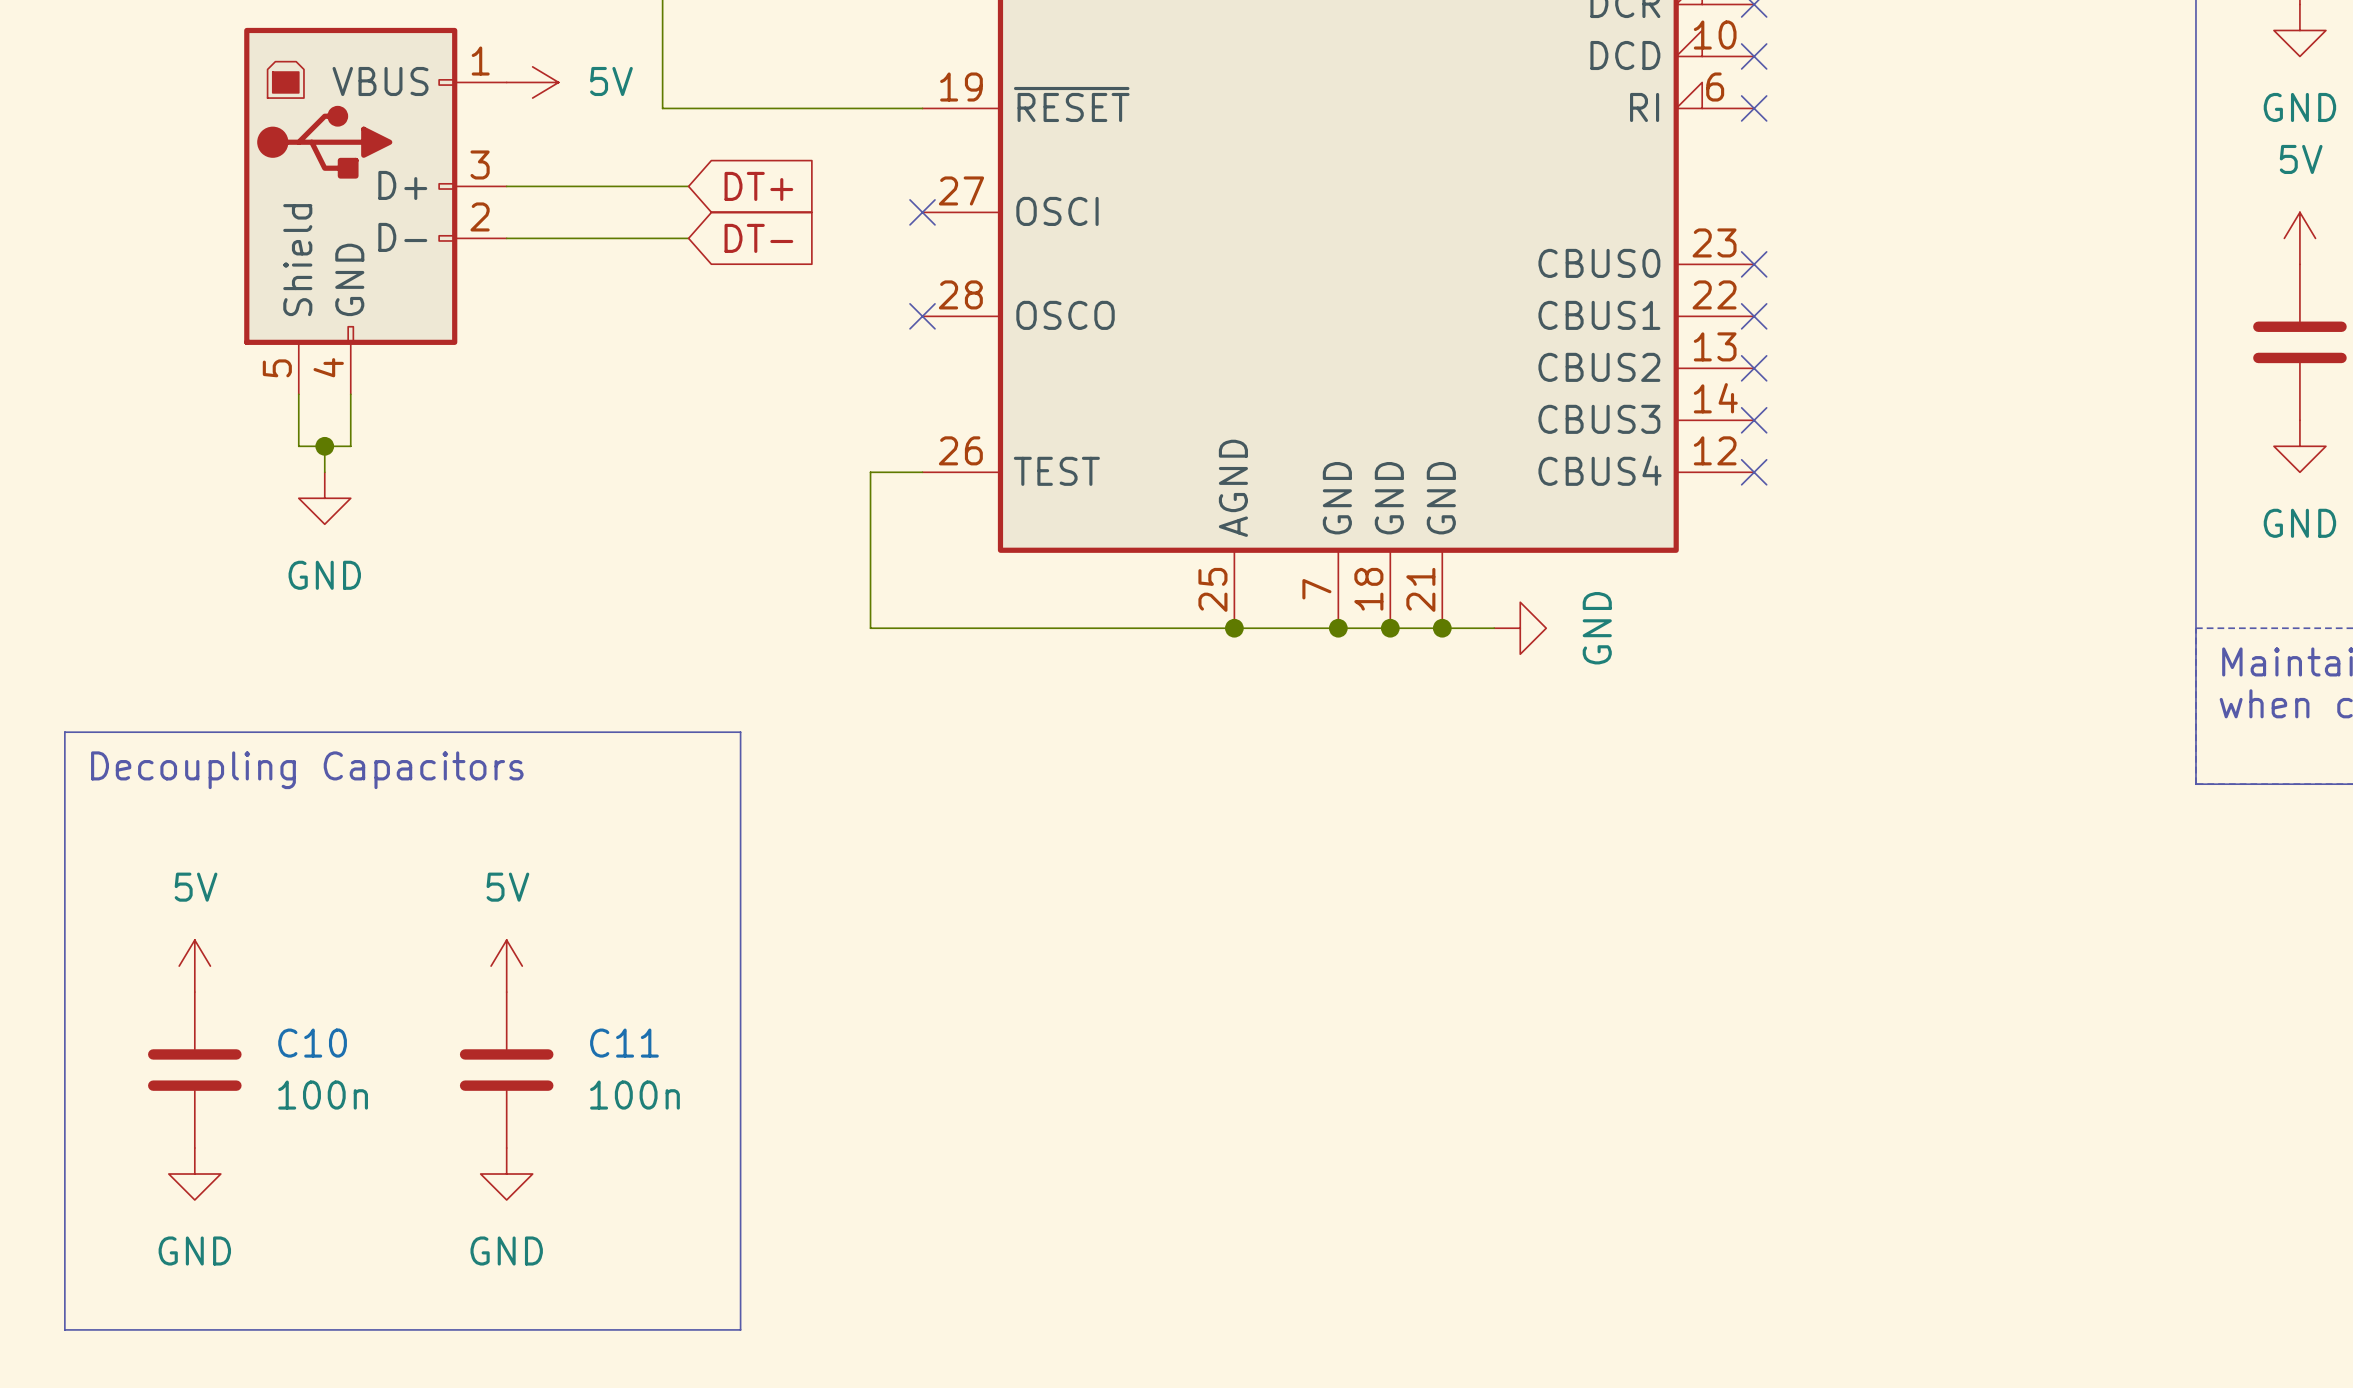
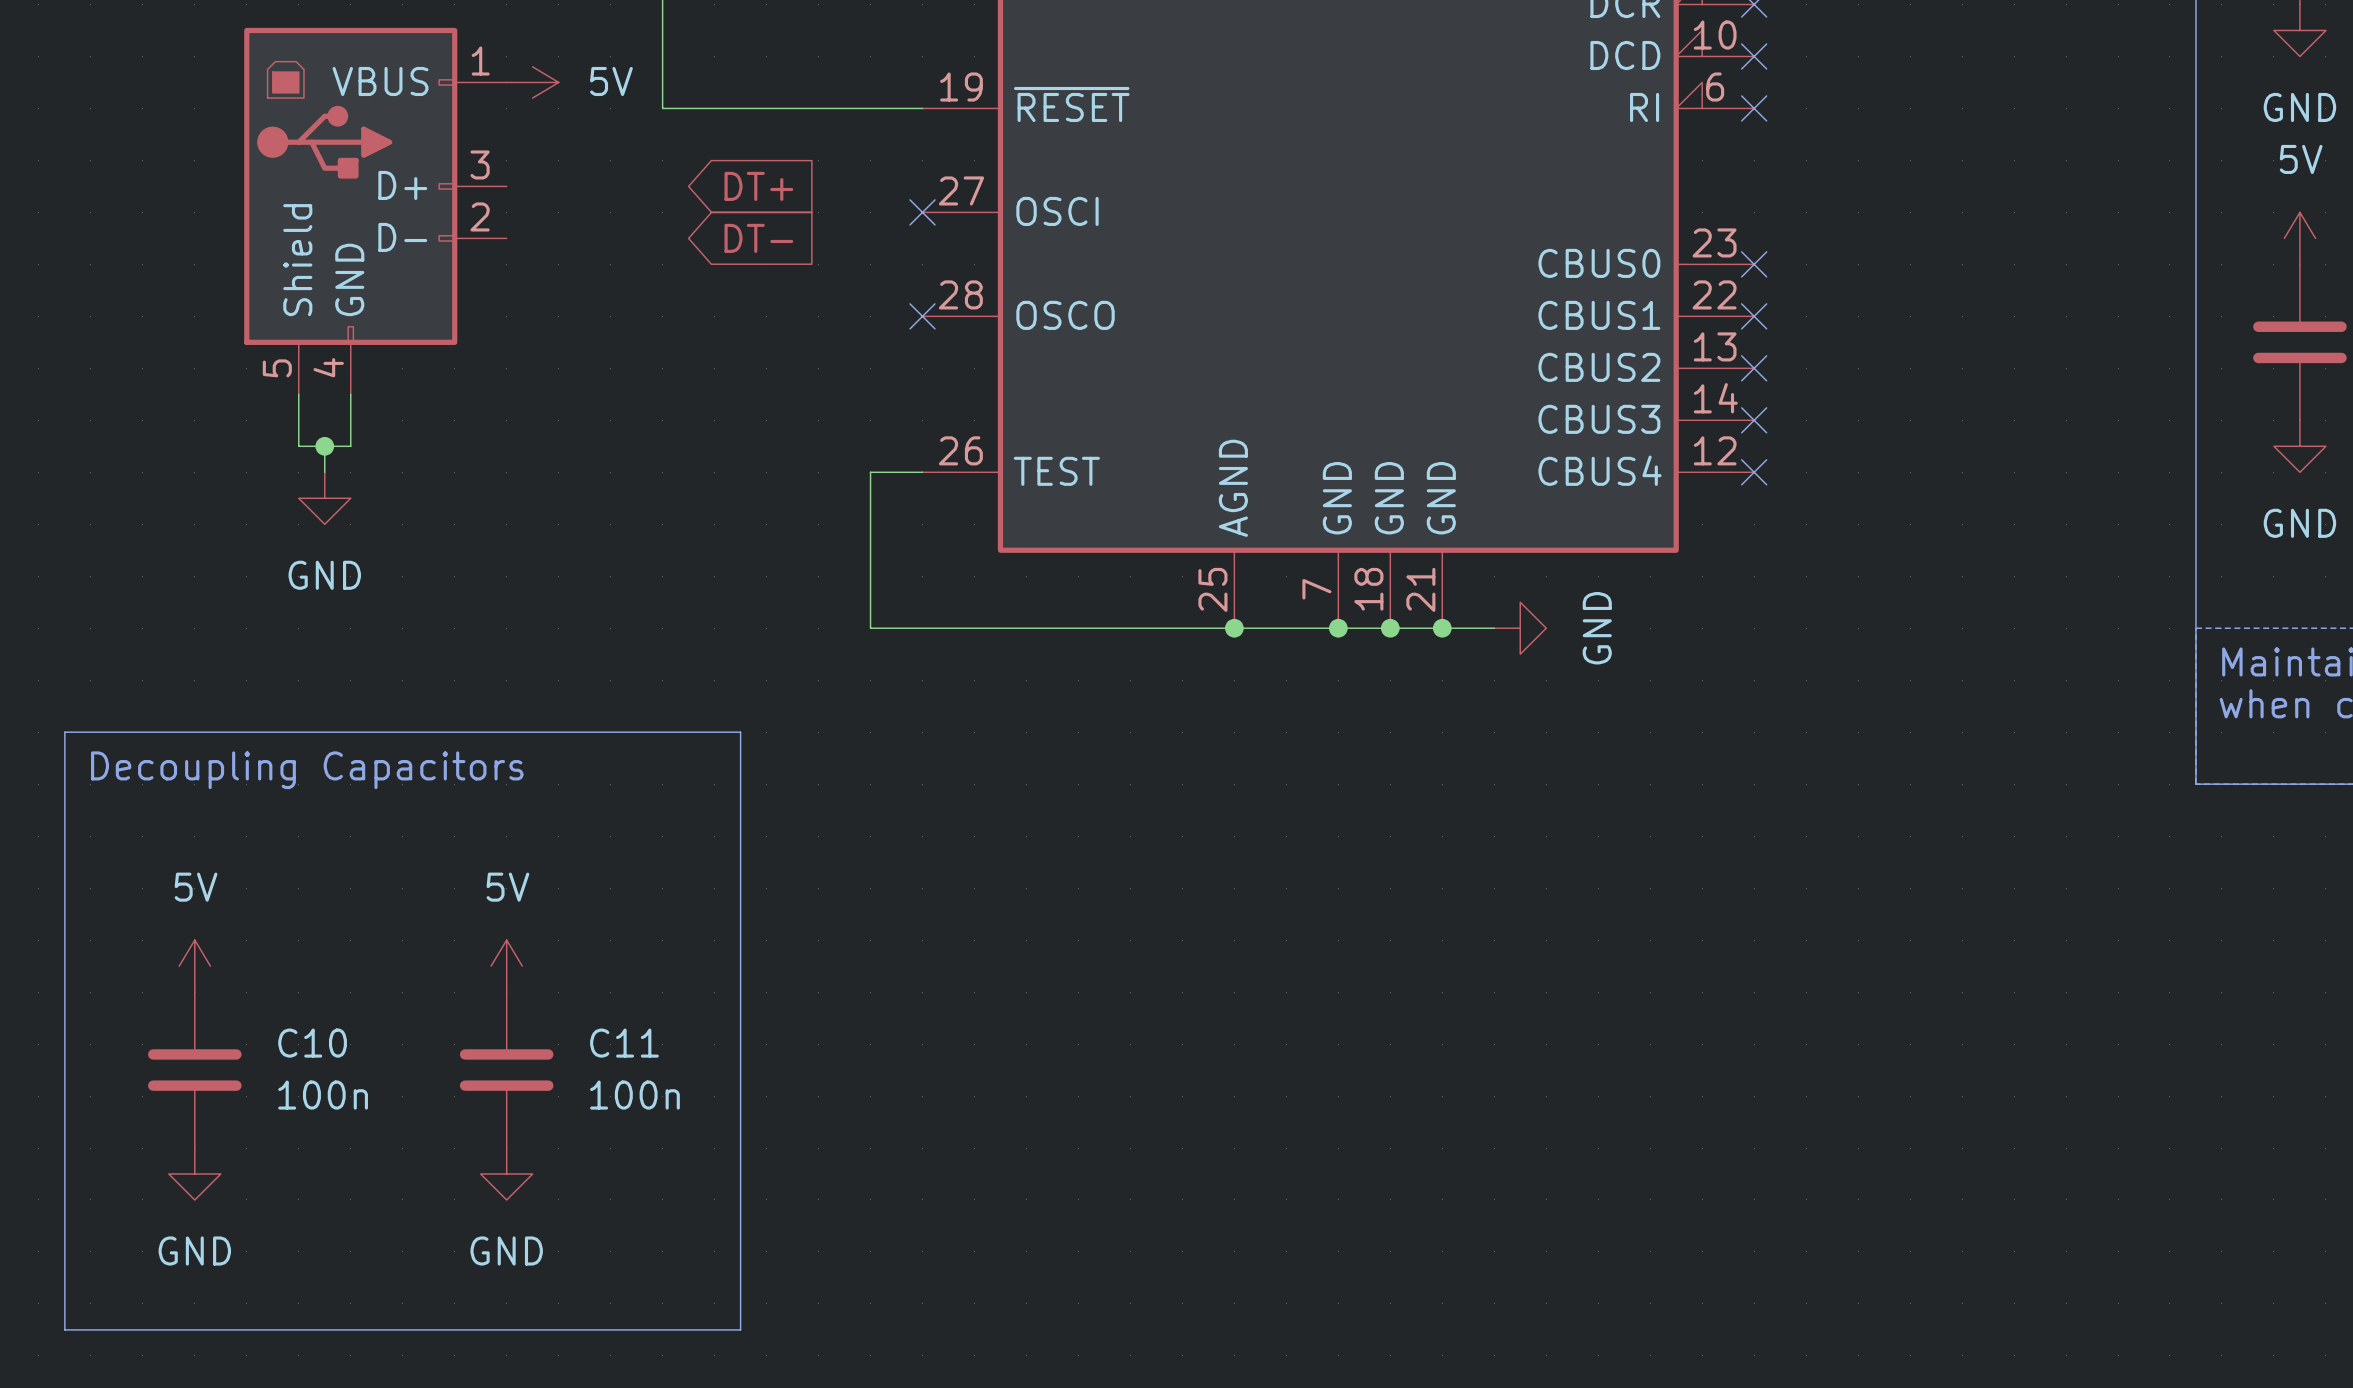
wire: (506, 186) (688, 186) -> none
wire: (506, 238) (688, 238) -> none

